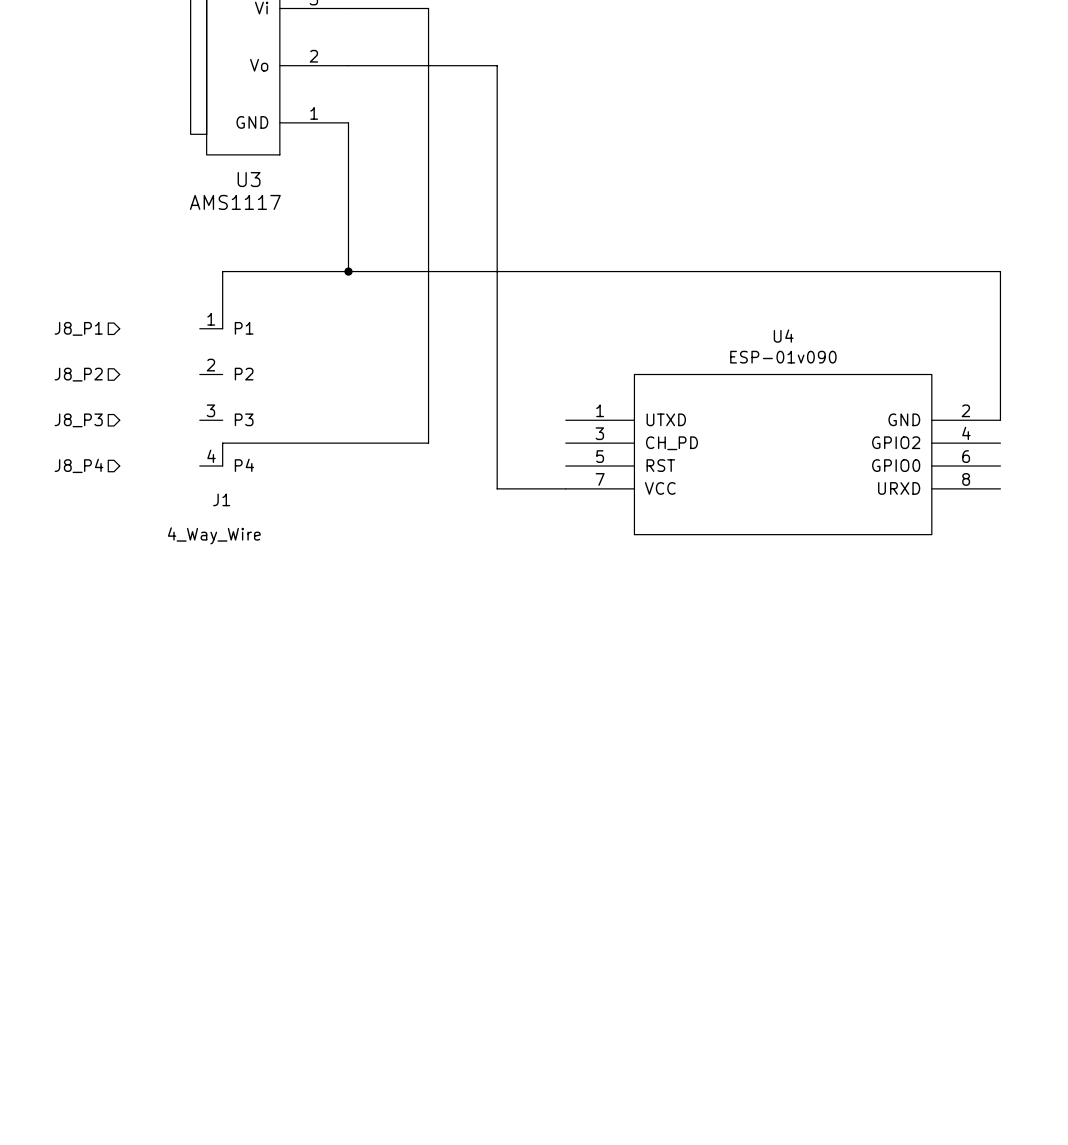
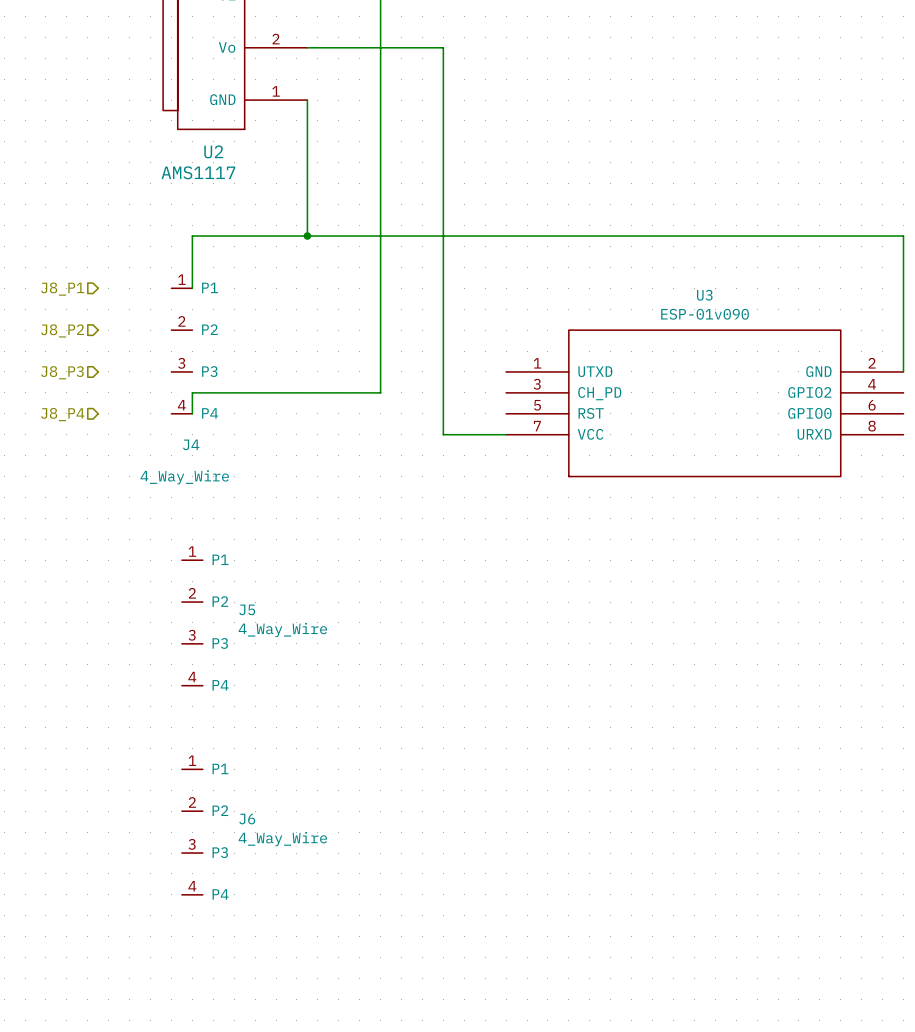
U3 name: U3 (249, 179) -> U2 (213, 151)
U4 name: U4 (783, 336) -> U3 (704, 295)
J1 name: J1 (221, 499) -> J4 (191, 444)
J5: none -> 4_Way_Wire (192, 622)
J6: none -> 4_Way_Wire (192, 832)

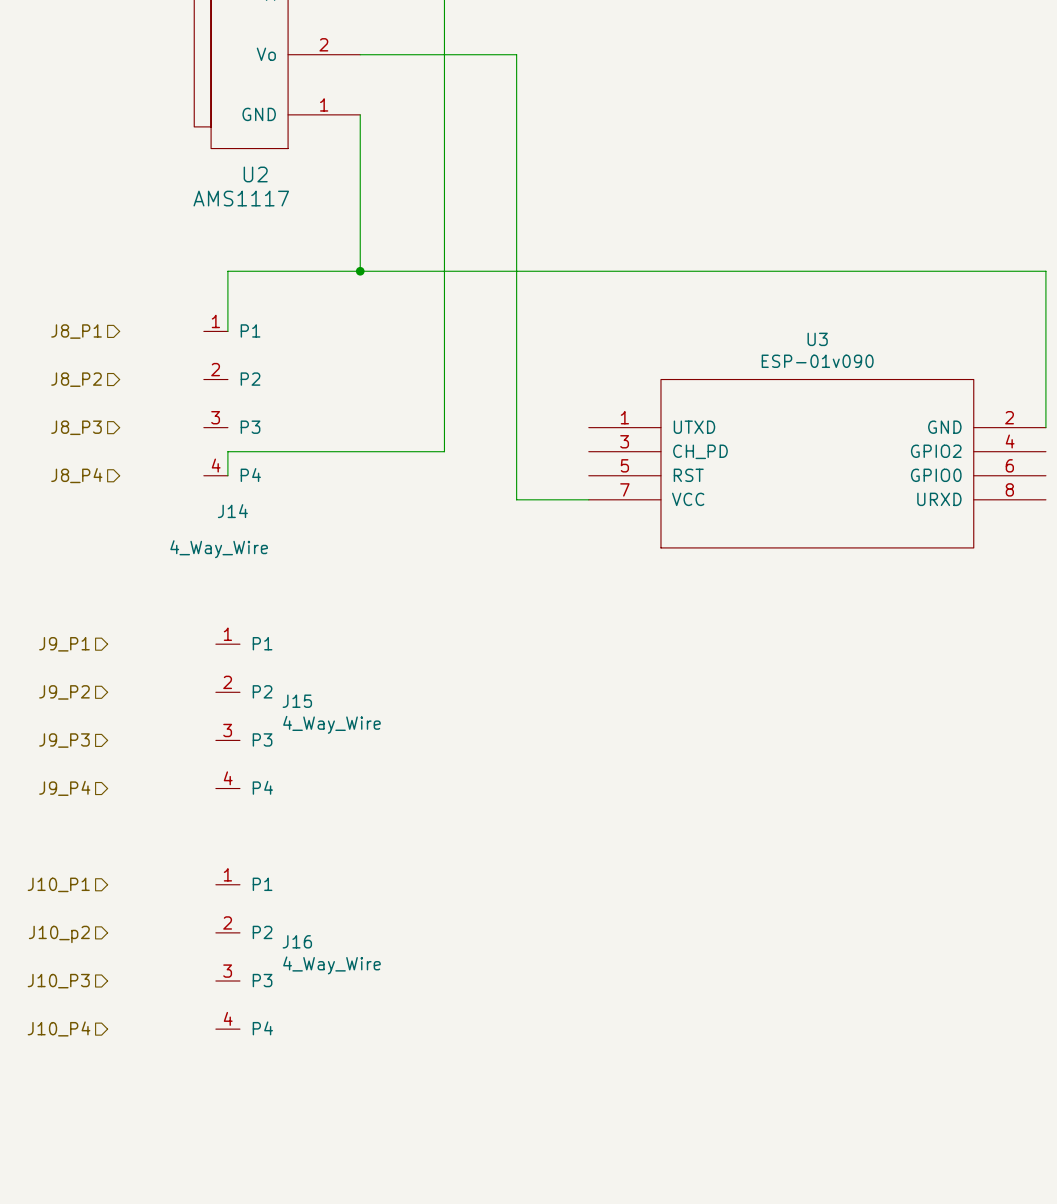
J4 name: J4 (191, 444) -> J14 (232, 511)
hierarchical label: none -> J9_P1 (64, 644)
hierarchical label: none -> J9_P2 (64, 692)
J5 name: J5 (247, 609) -> J15 (297, 701)
hierarchical label: none -> J9_P3 (64, 740)
hierarchical label: none -> J9_P4 (64, 788)
hierarchical label: none -> J10_P1 (58, 884)
hierarchical label: none -> J10_p2 (59, 934)
J6 name: J6 (247, 819) -> J16 (297, 941)
hierarchical label: none -> J10_P3 (58, 981)
hierarchical label: none -> J10_P4 (59, 1028)

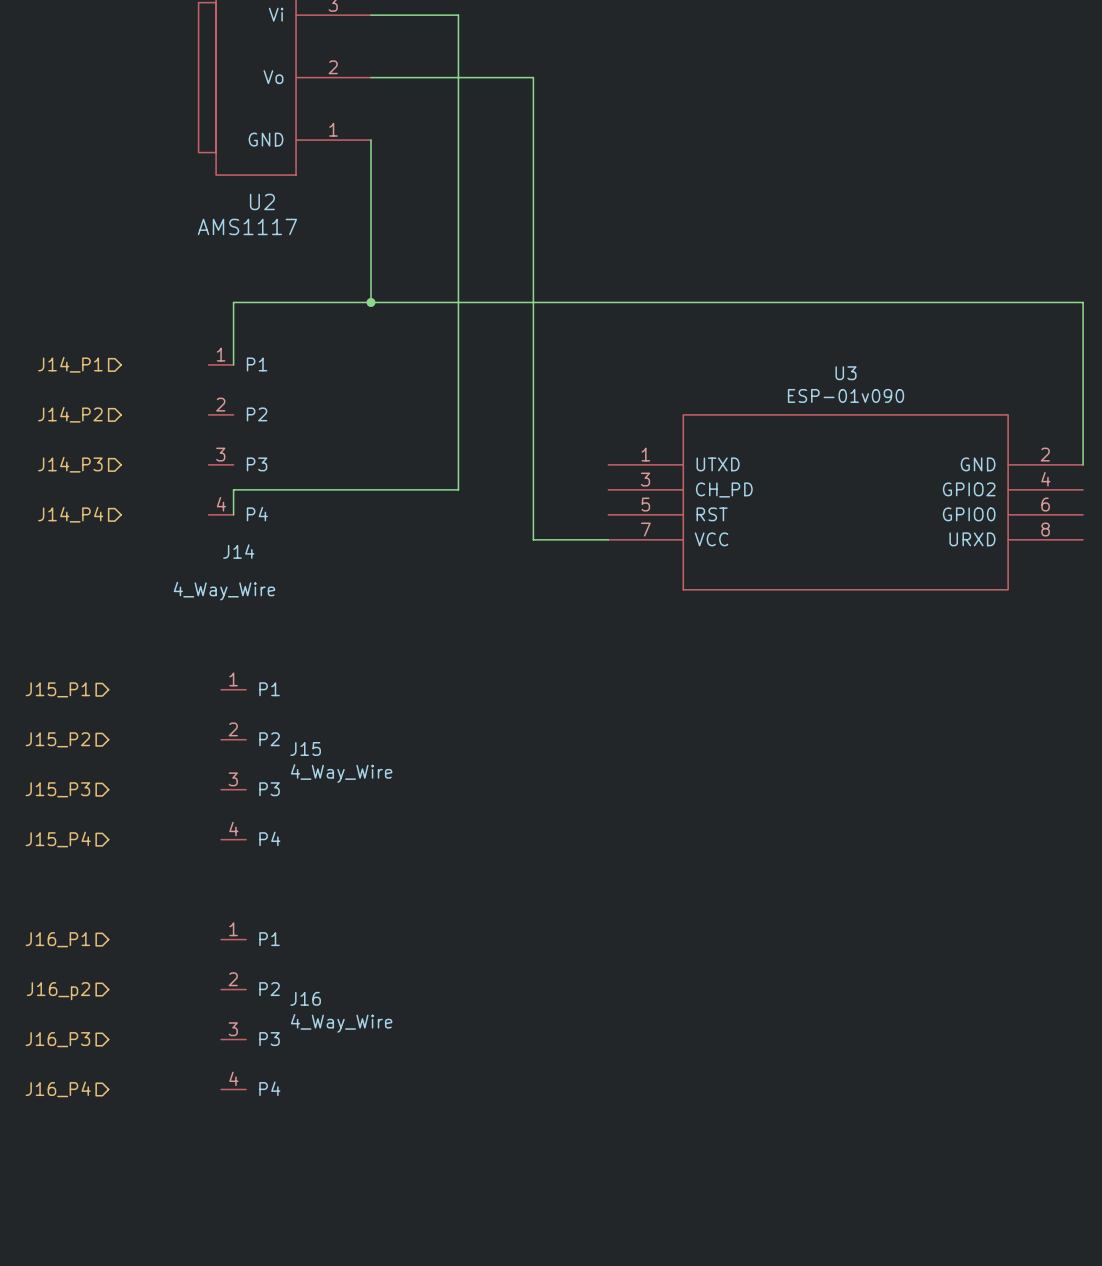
hierarchical label: J8_P1 (76, 331) -> J14_P1 (70, 364)
hierarchical label: J8_P2 (76, 379) -> J14_P2 (70, 414)
hierarchical label: J8_P3 (76, 427) -> J14_P3 (70, 464)
hierarchical label: J8_P4 (76, 475) -> J14_P4 (70, 514)
hierarchical label: J9_P1 (64, 644) -> J15_P1 (57, 689)
hierarchical label: J9_P2 (64, 692) -> J15_P2 (57, 739)
hierarchical label: J9_P3 (64, 740) -> J15_P3 (57, 789)
hierarchical label: J9_P4 (64, 788) -> J15_P4 (58, 839)
hierarchical label: J10_P1 (58, 884) -> J16_P1 (57, 939)
hierarchical label: J10_p2 (59, 934) -> J16_p2 (58, 991)
hierarchical label: J10_P3 (58, 981) -> J16_P3 (57, 1039)
hierarchical label: J10_P4 (59, 1028) -> J16_P4 (58, 1089)

